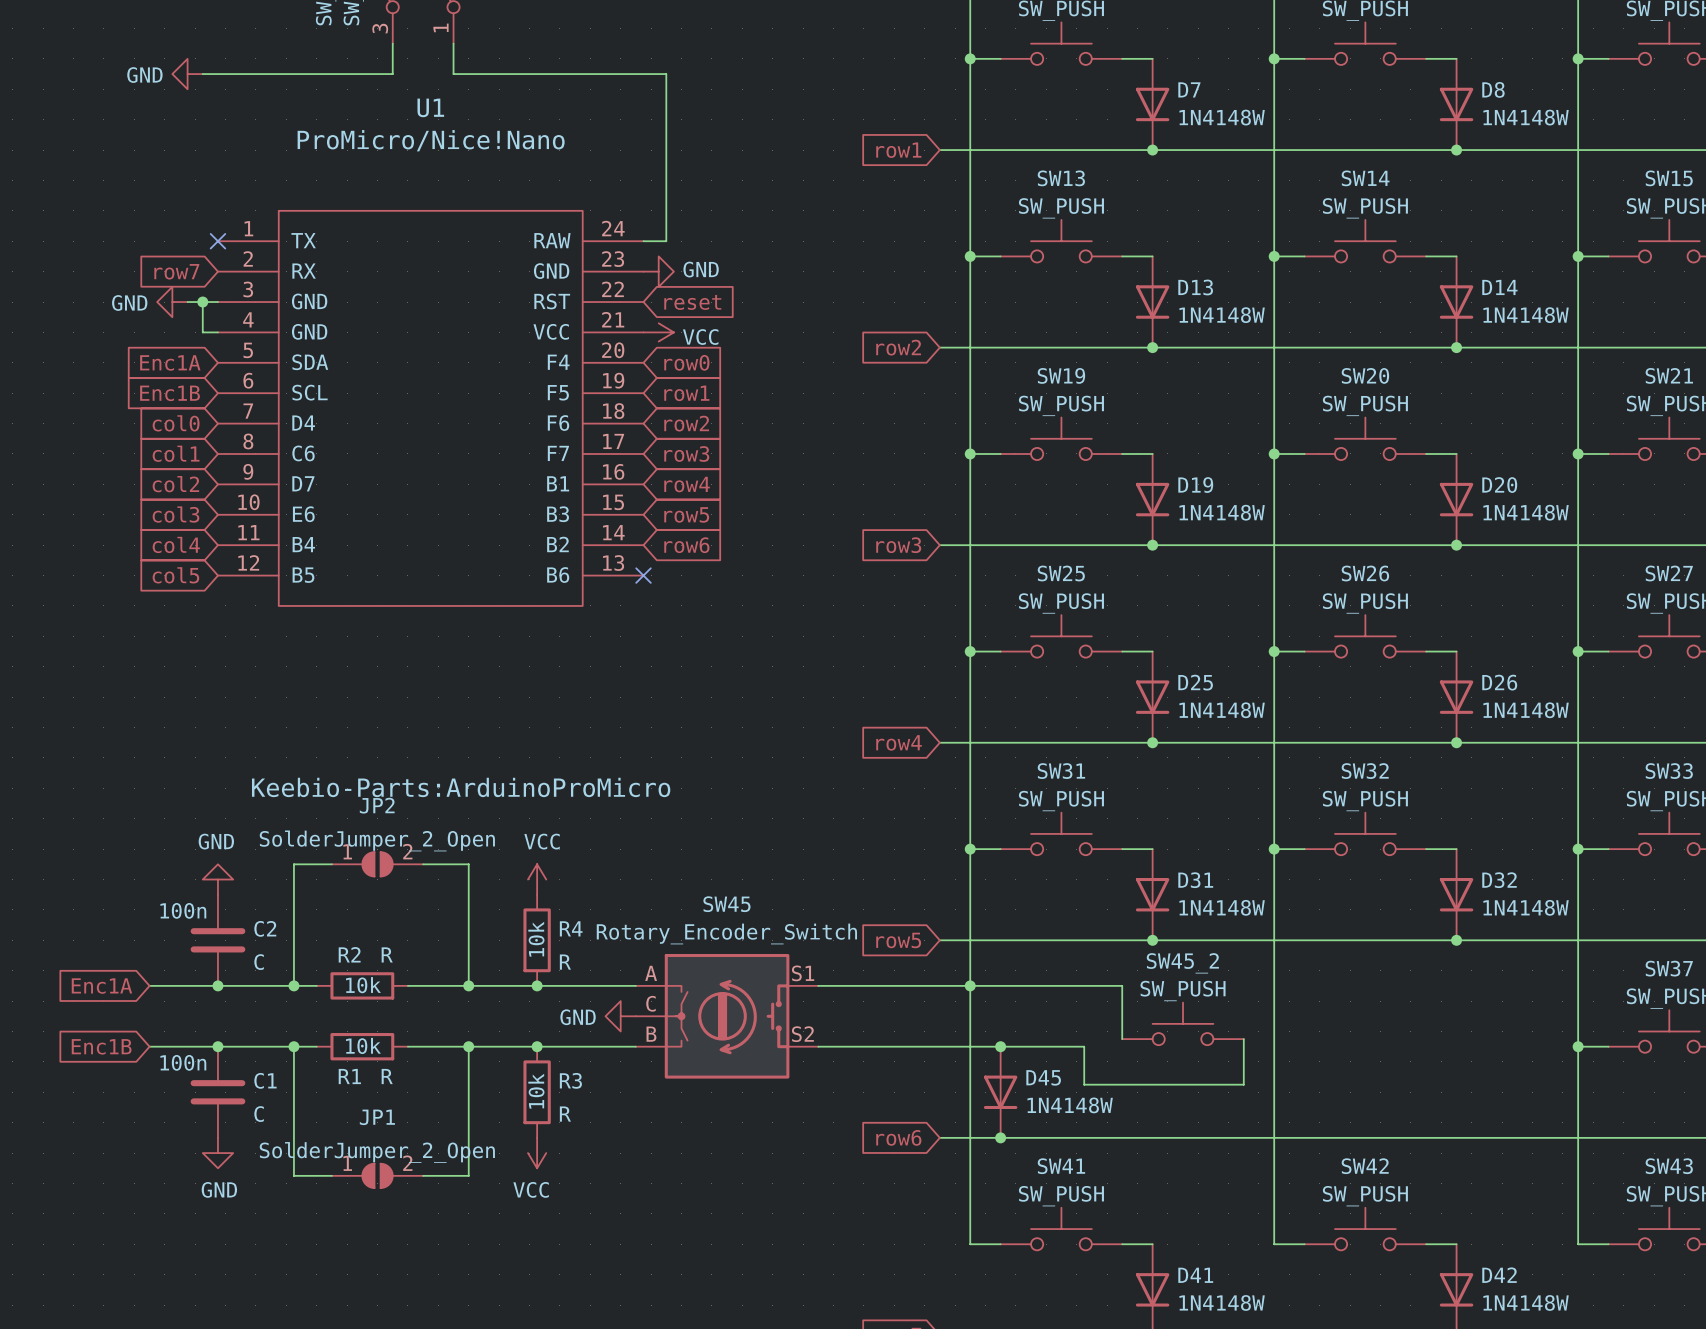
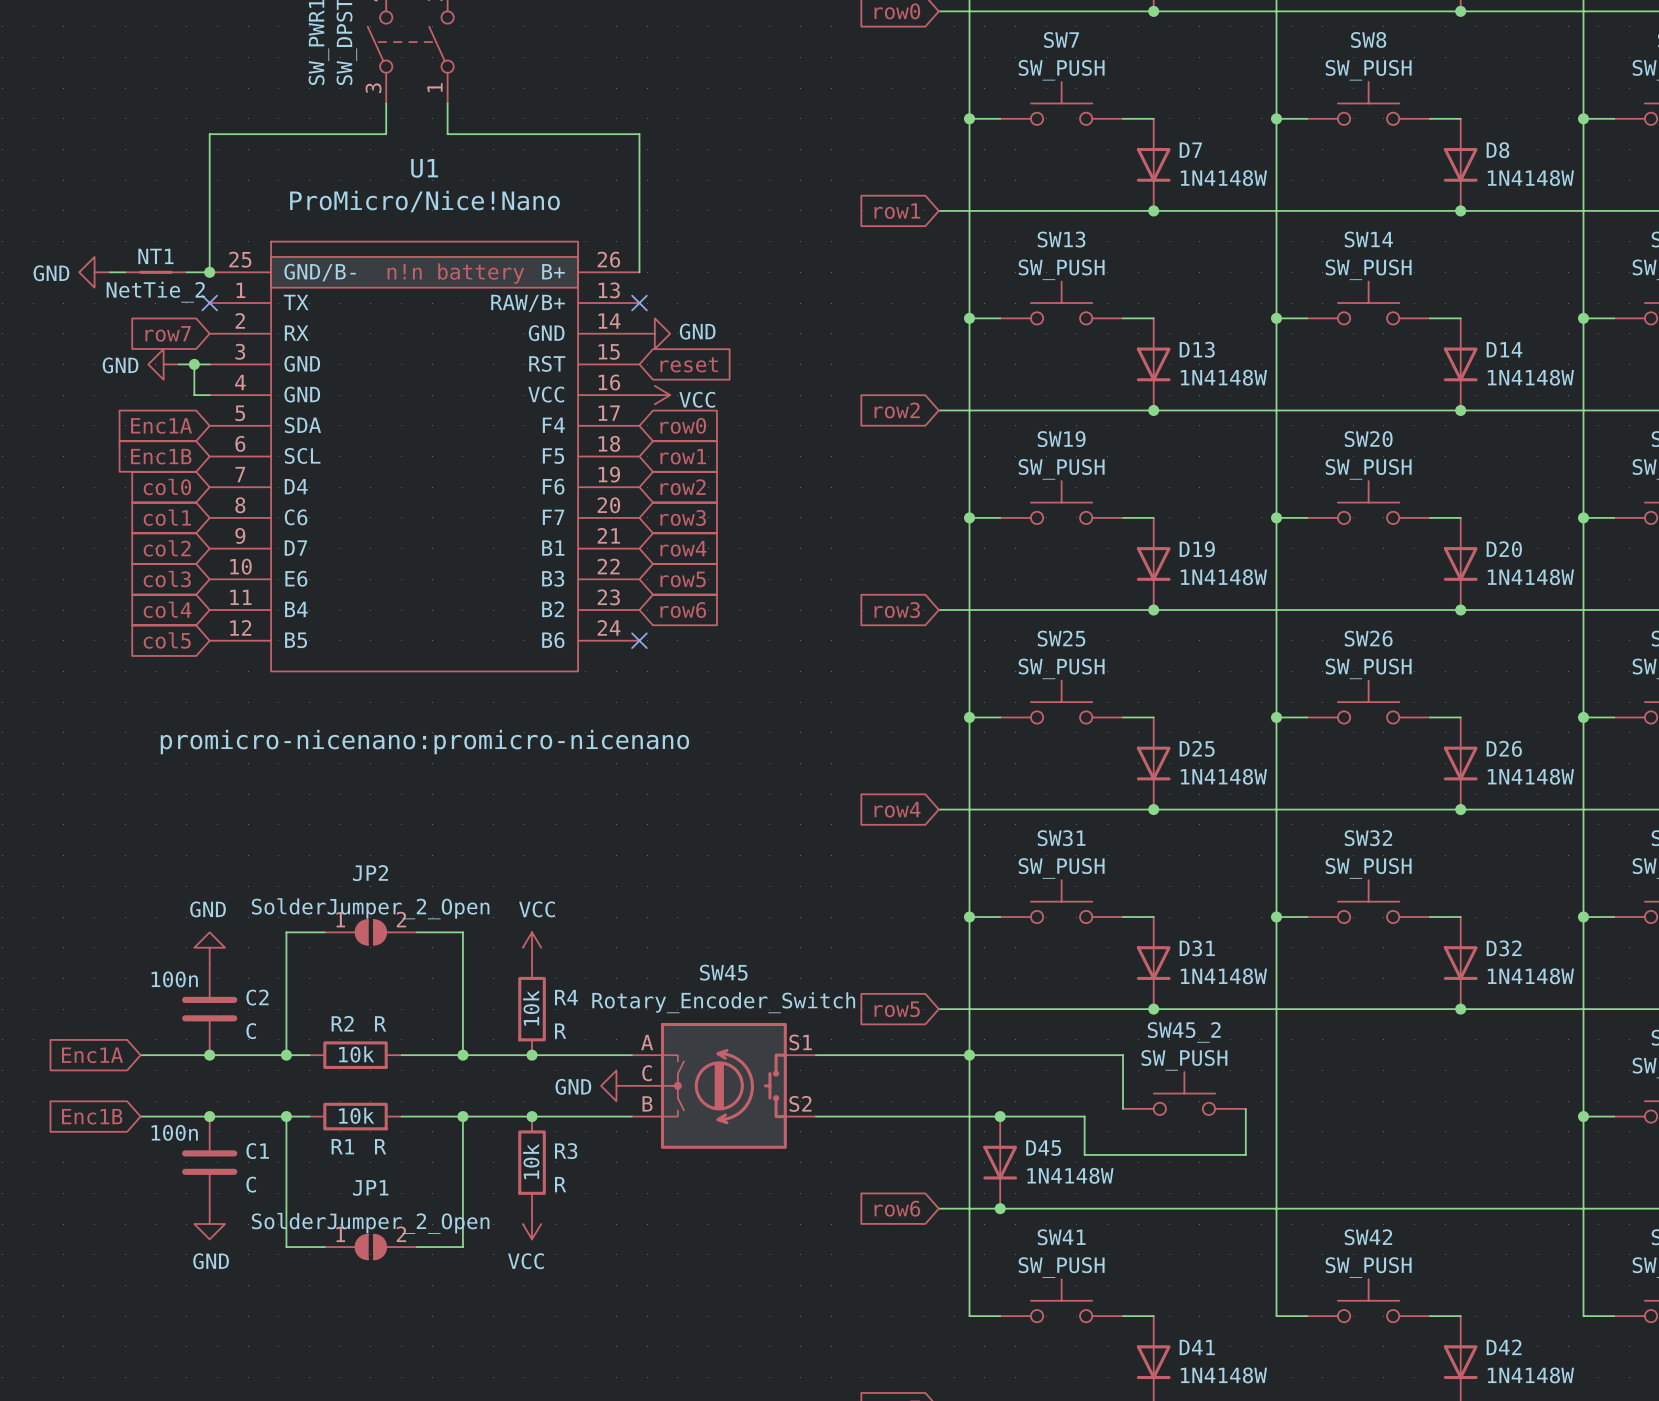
power symbol position: GND (187, 74) -> GND (94, 272)
wire: (202, 74) (217, 74) -> (186, 272) (209, 272) (209, 134)
wire: (643, 74) (666, 74) (666, 241) (643, 241) -> (639, 134) (639, 272)
wire: none -> (109, 272) (125, 272)
NT1: none -> NetTie_2 (155, 272)
U1 symbol: [217, 210, 644, 606] -> [209, 241, 640, 672]
junction: none -> (209, 272)
no-connect mark: none -> (639, 303)
U1 text: Keebio-Parts:ArduinoProMicro (461, 787) -> promicro-nicenano:promicro-nicenano (424, 742)

